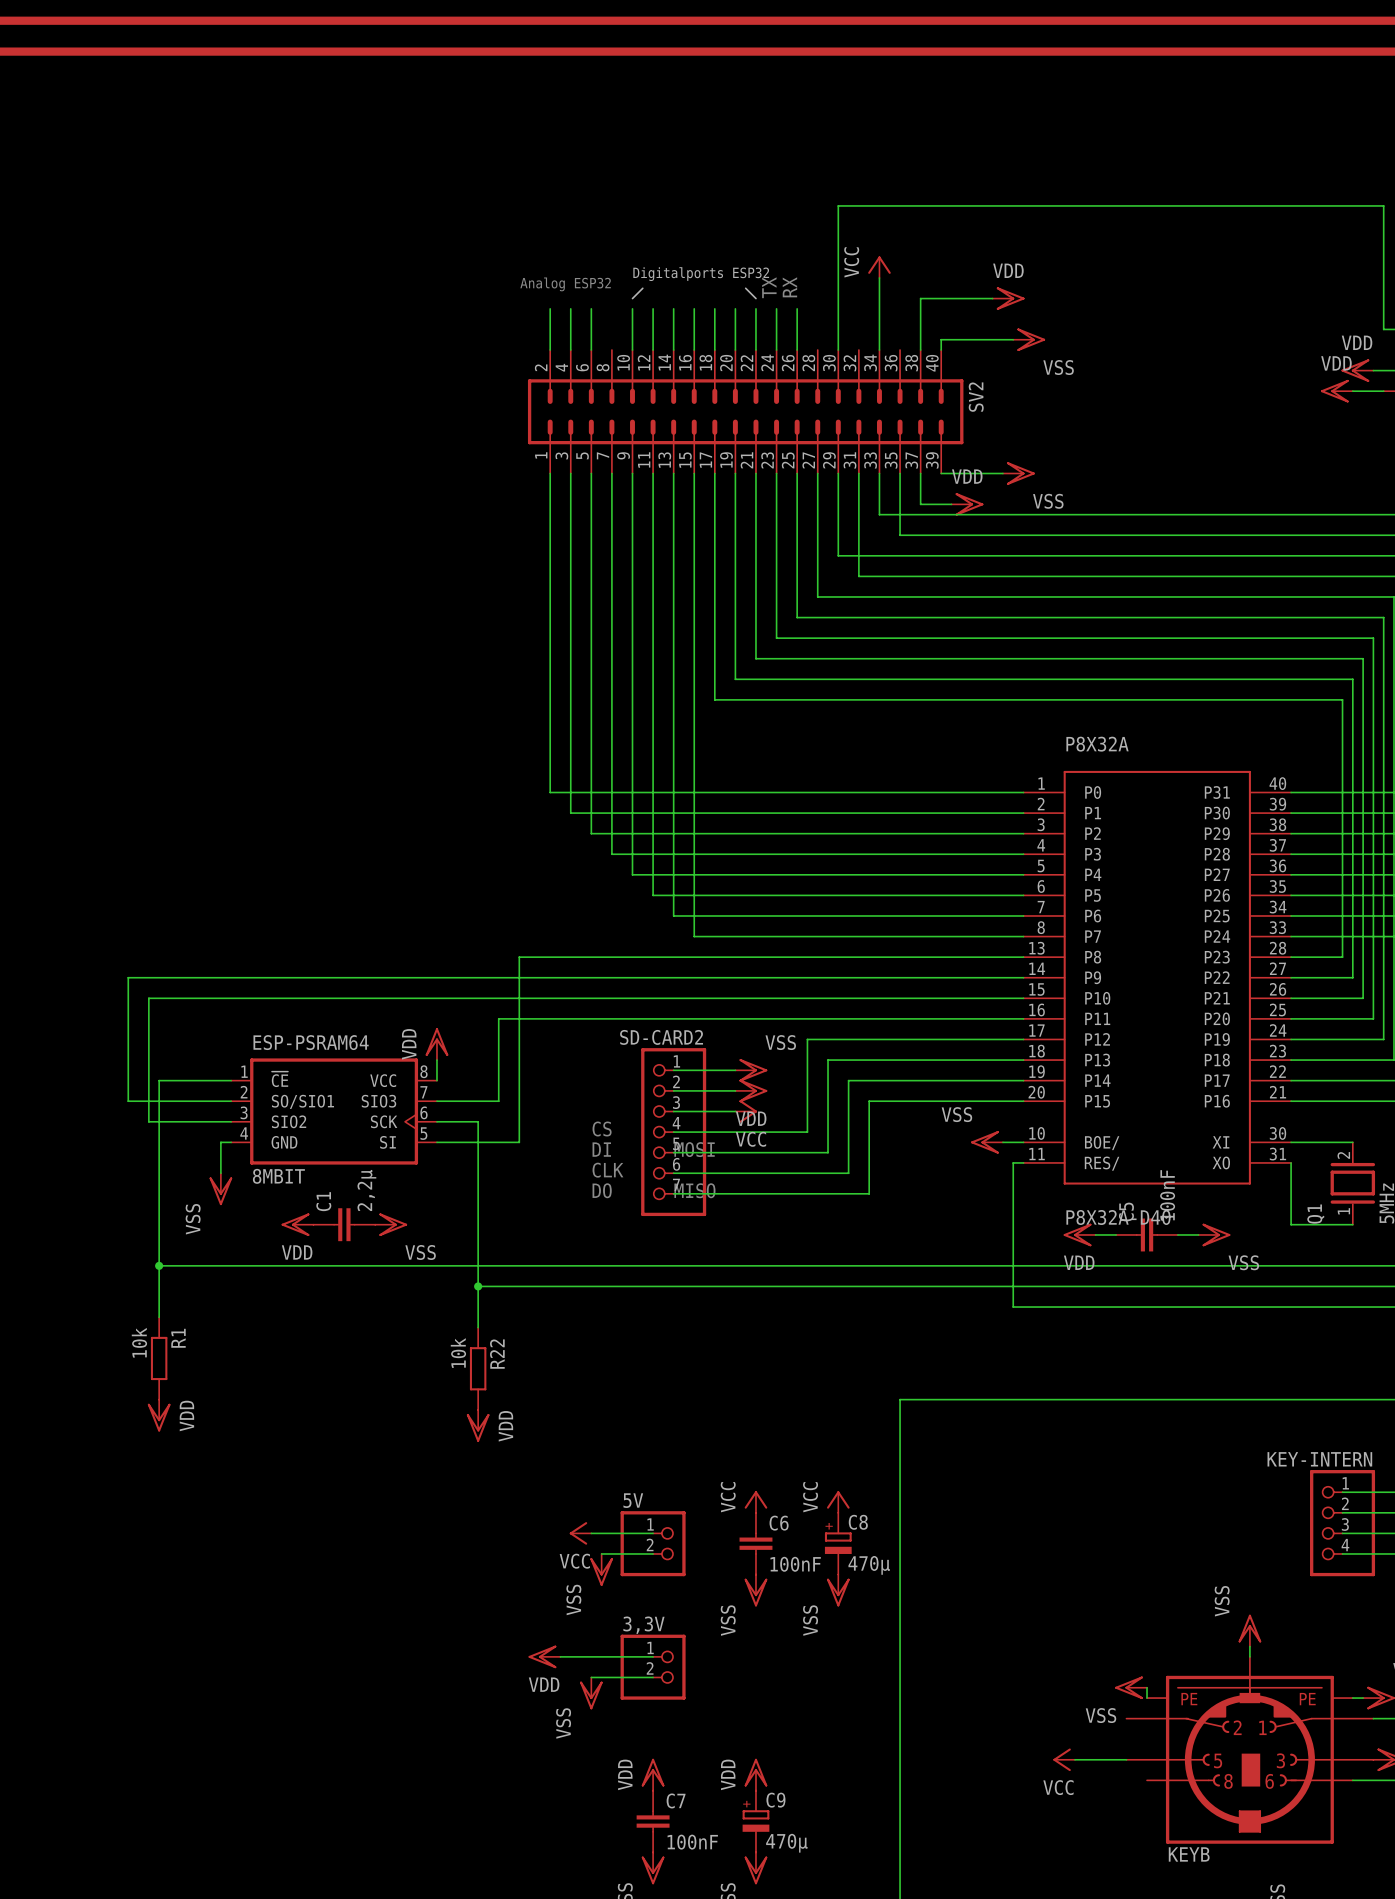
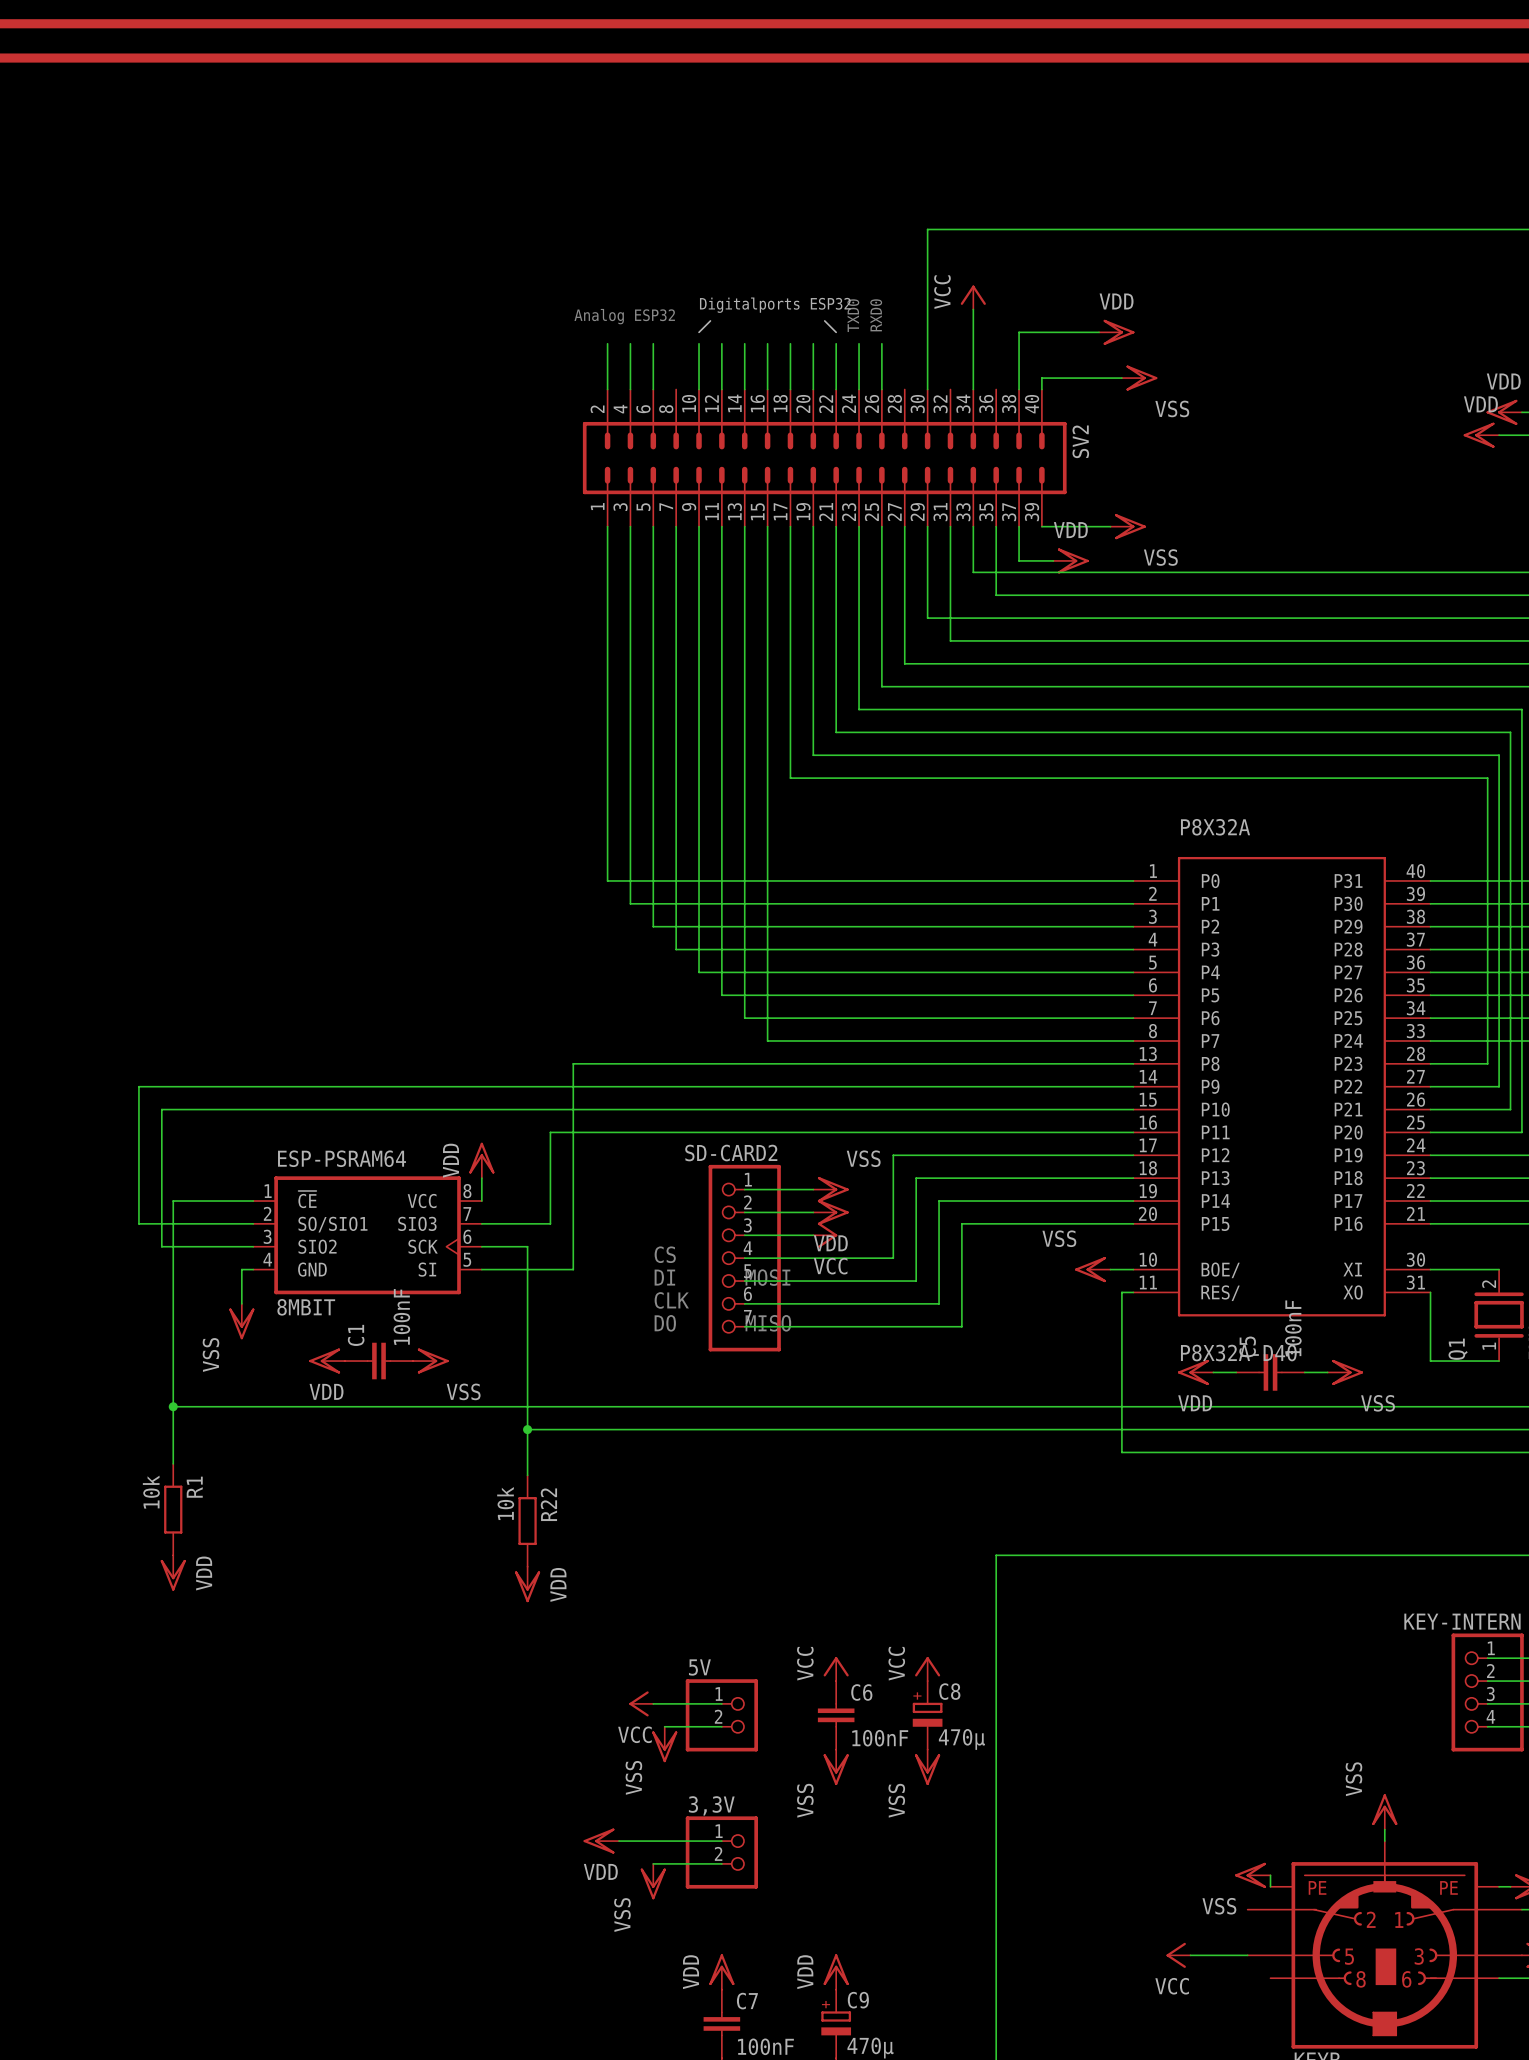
text: TX (769, 287) -> TXD0 (853, 315)
text: RX (789, 287) -> RXD0 (876, 315)
C1 value: 2,2µ (366, 1190) -> 100nF (401, 1316)

